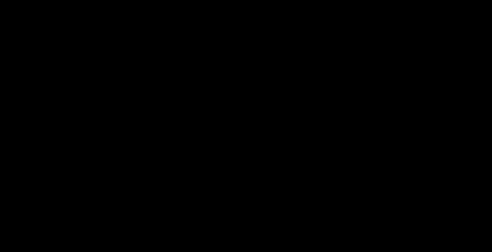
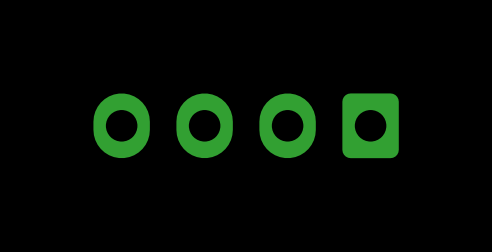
part: none -> (246, 125)

